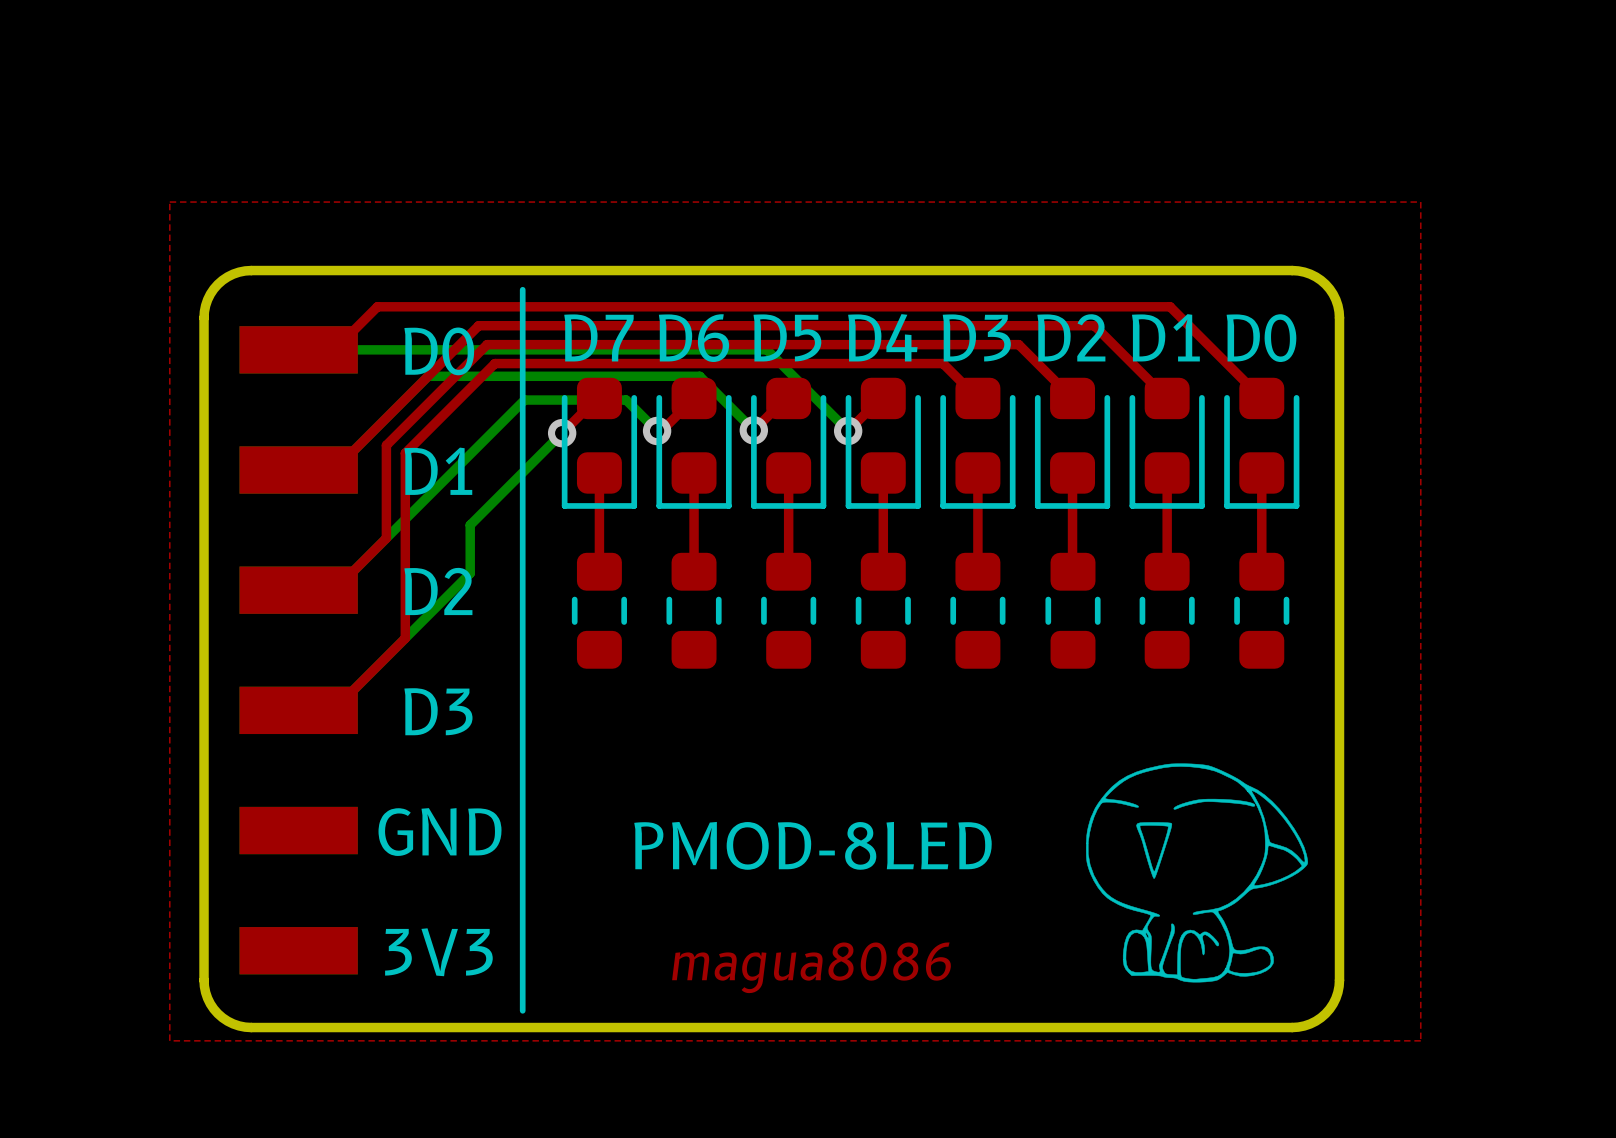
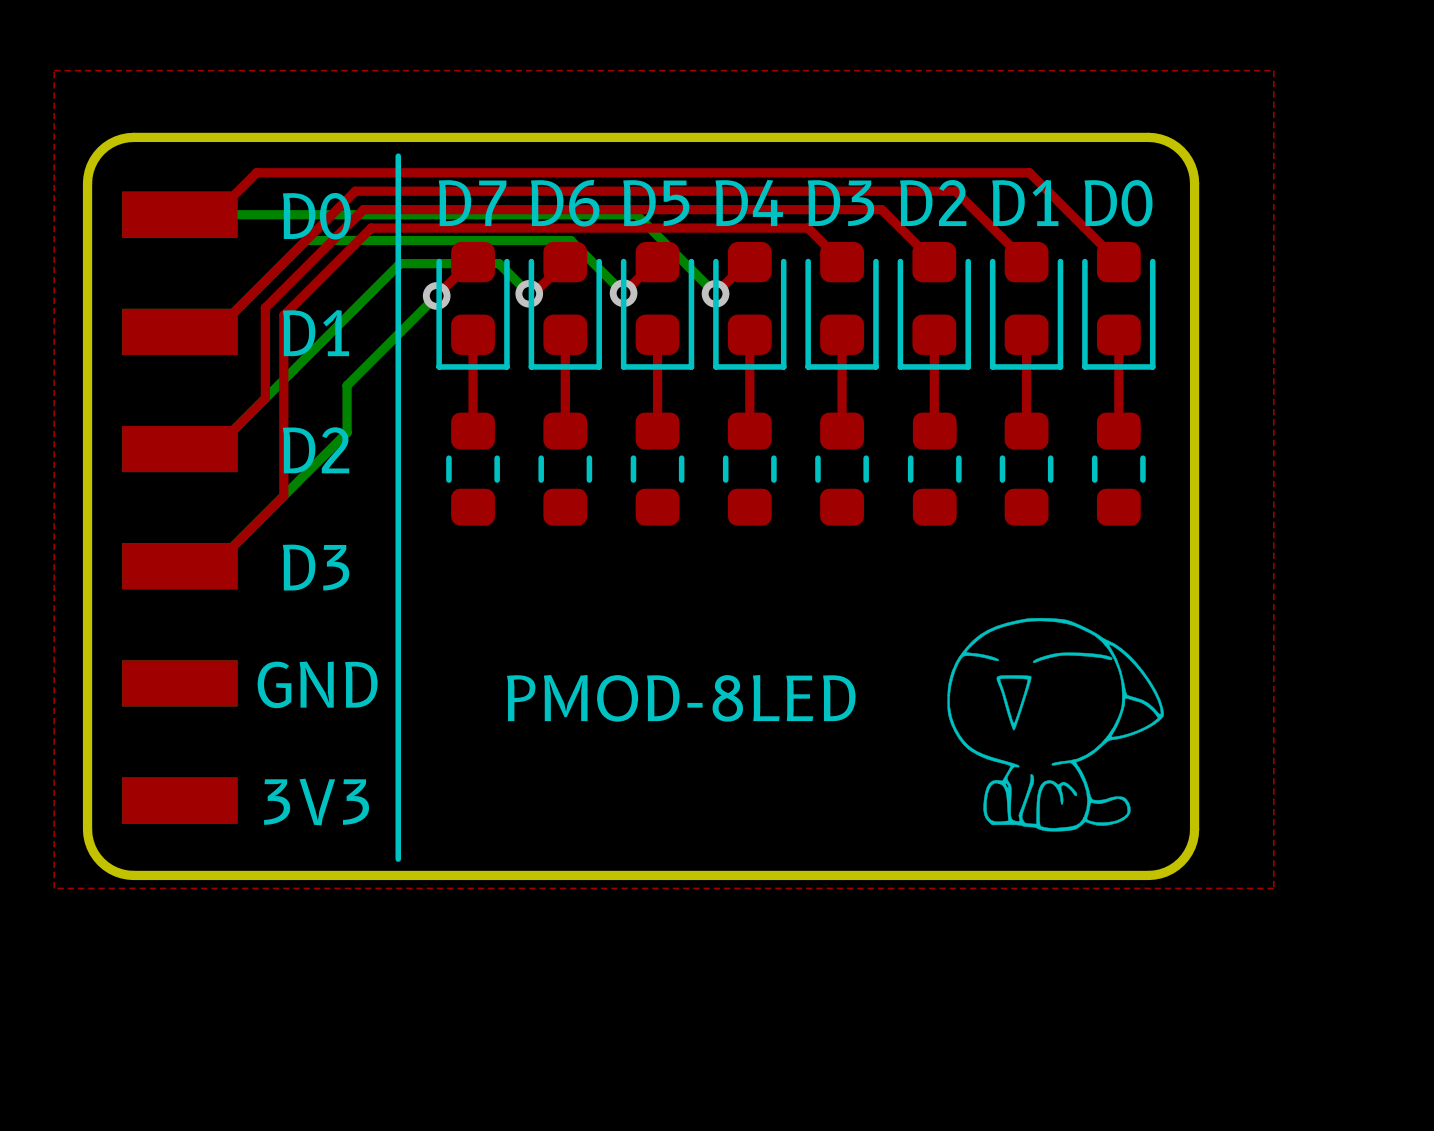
text: magua8086 (811, 967) -> none

